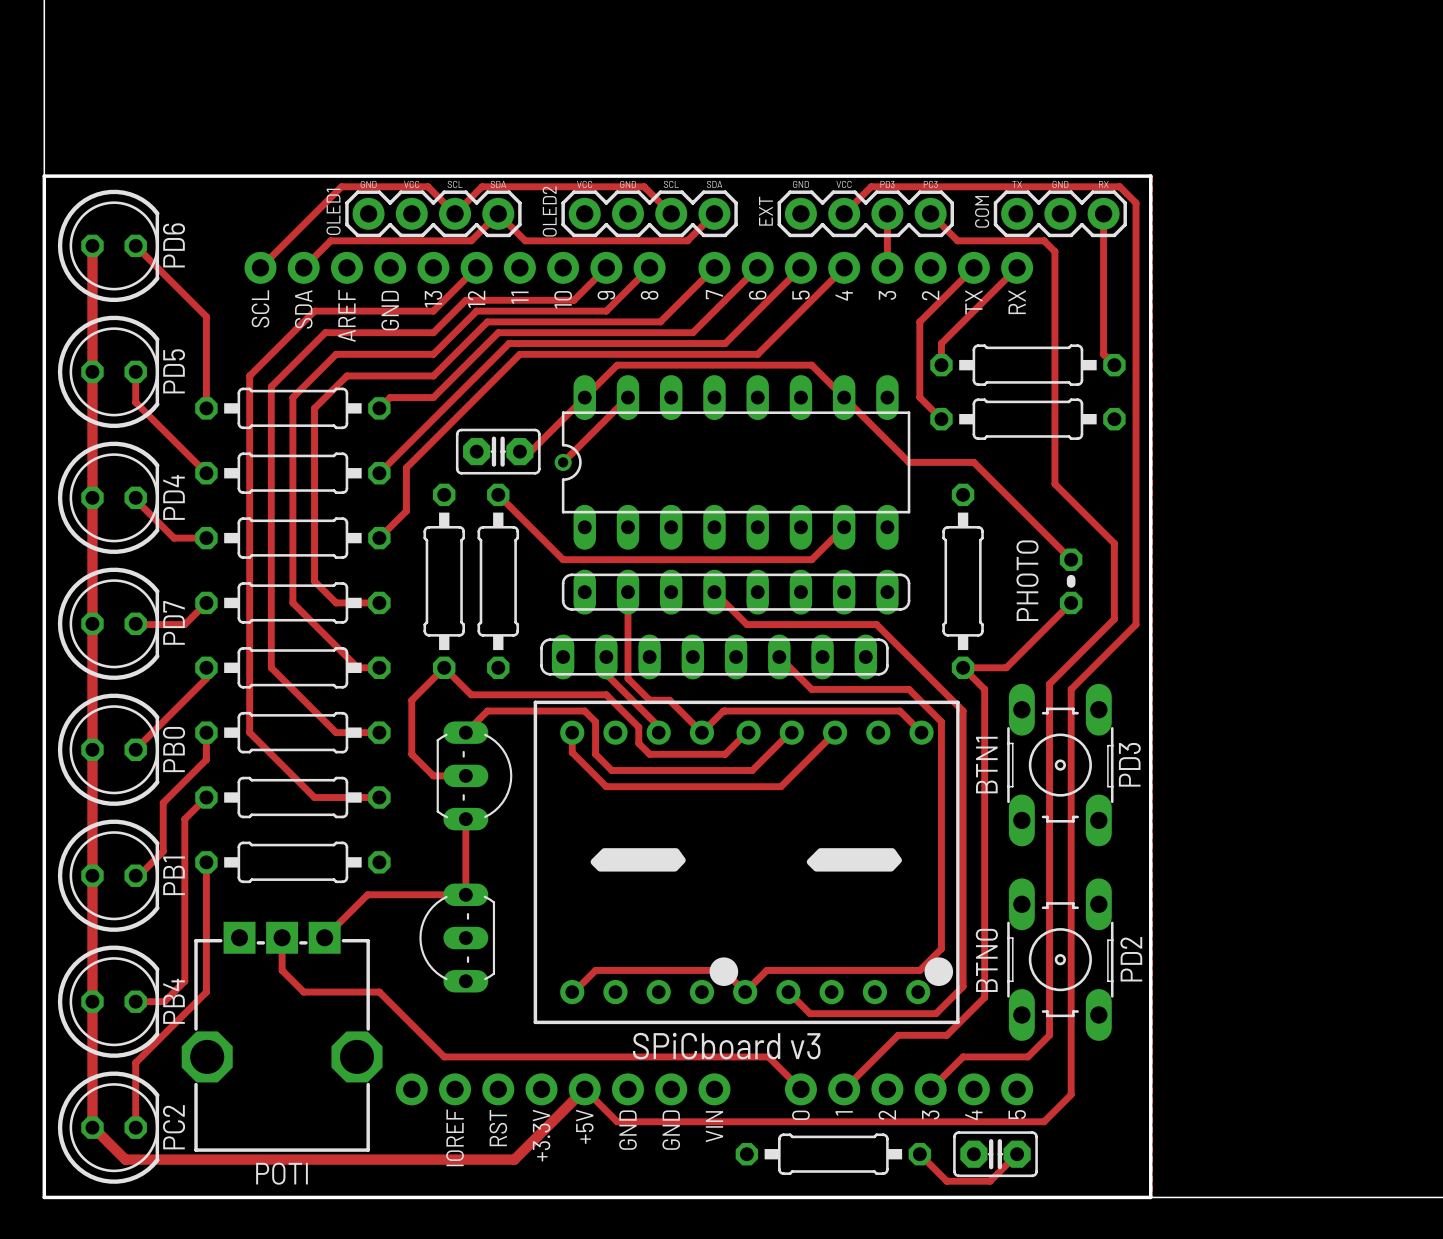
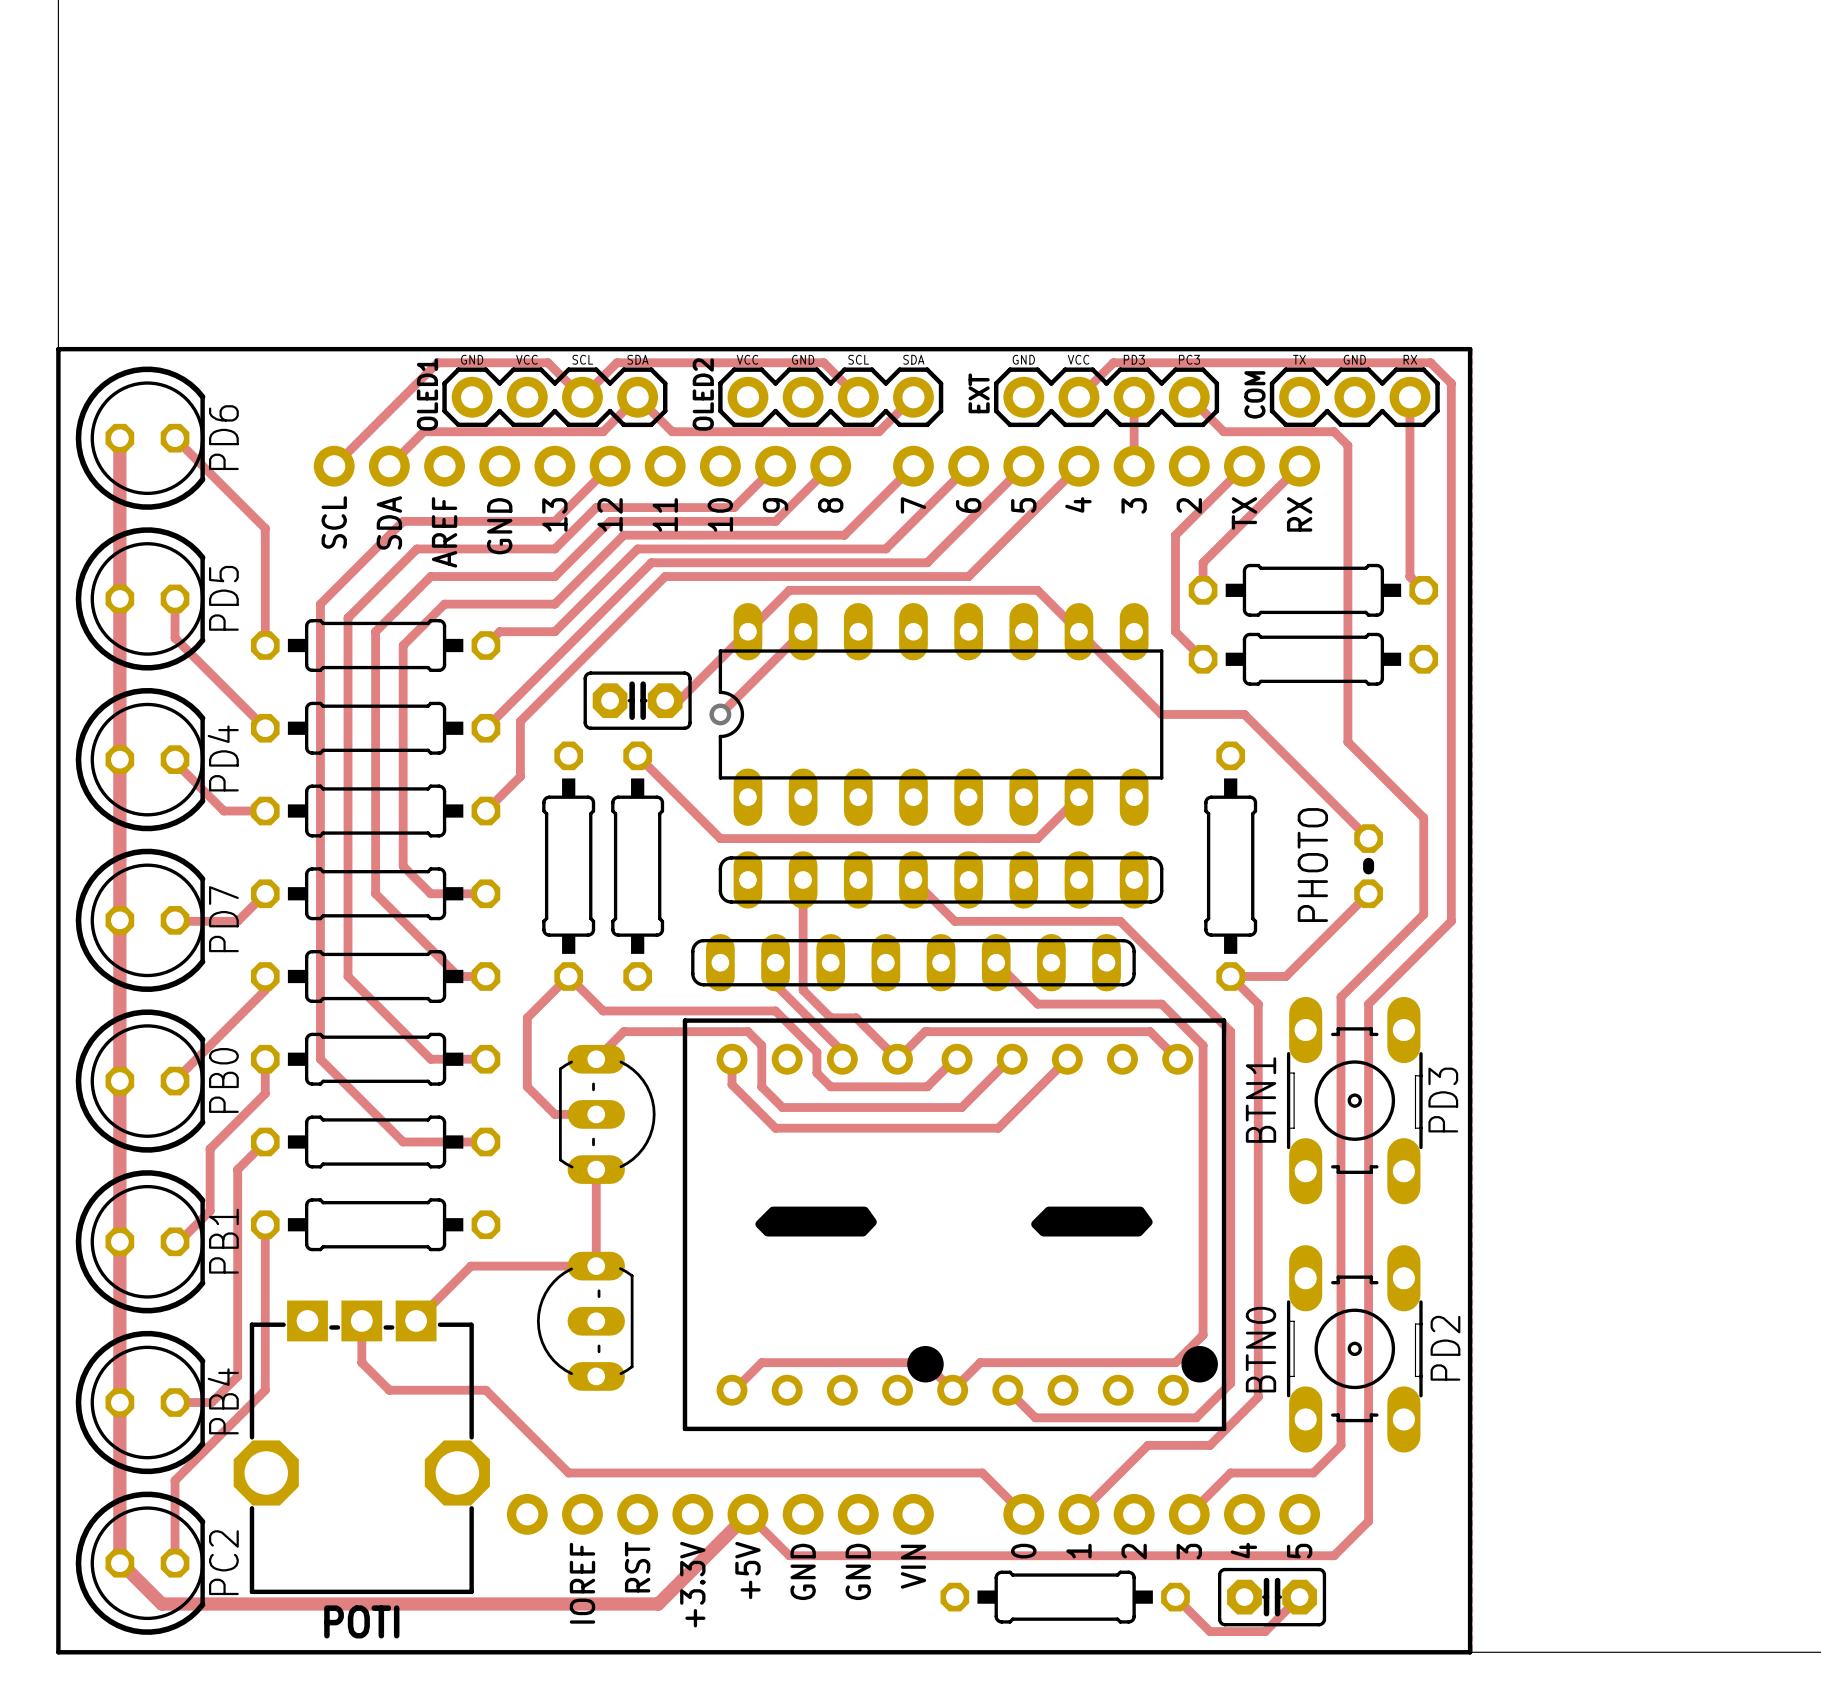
text: SPiCboard v3 (726, 1046) -> none

